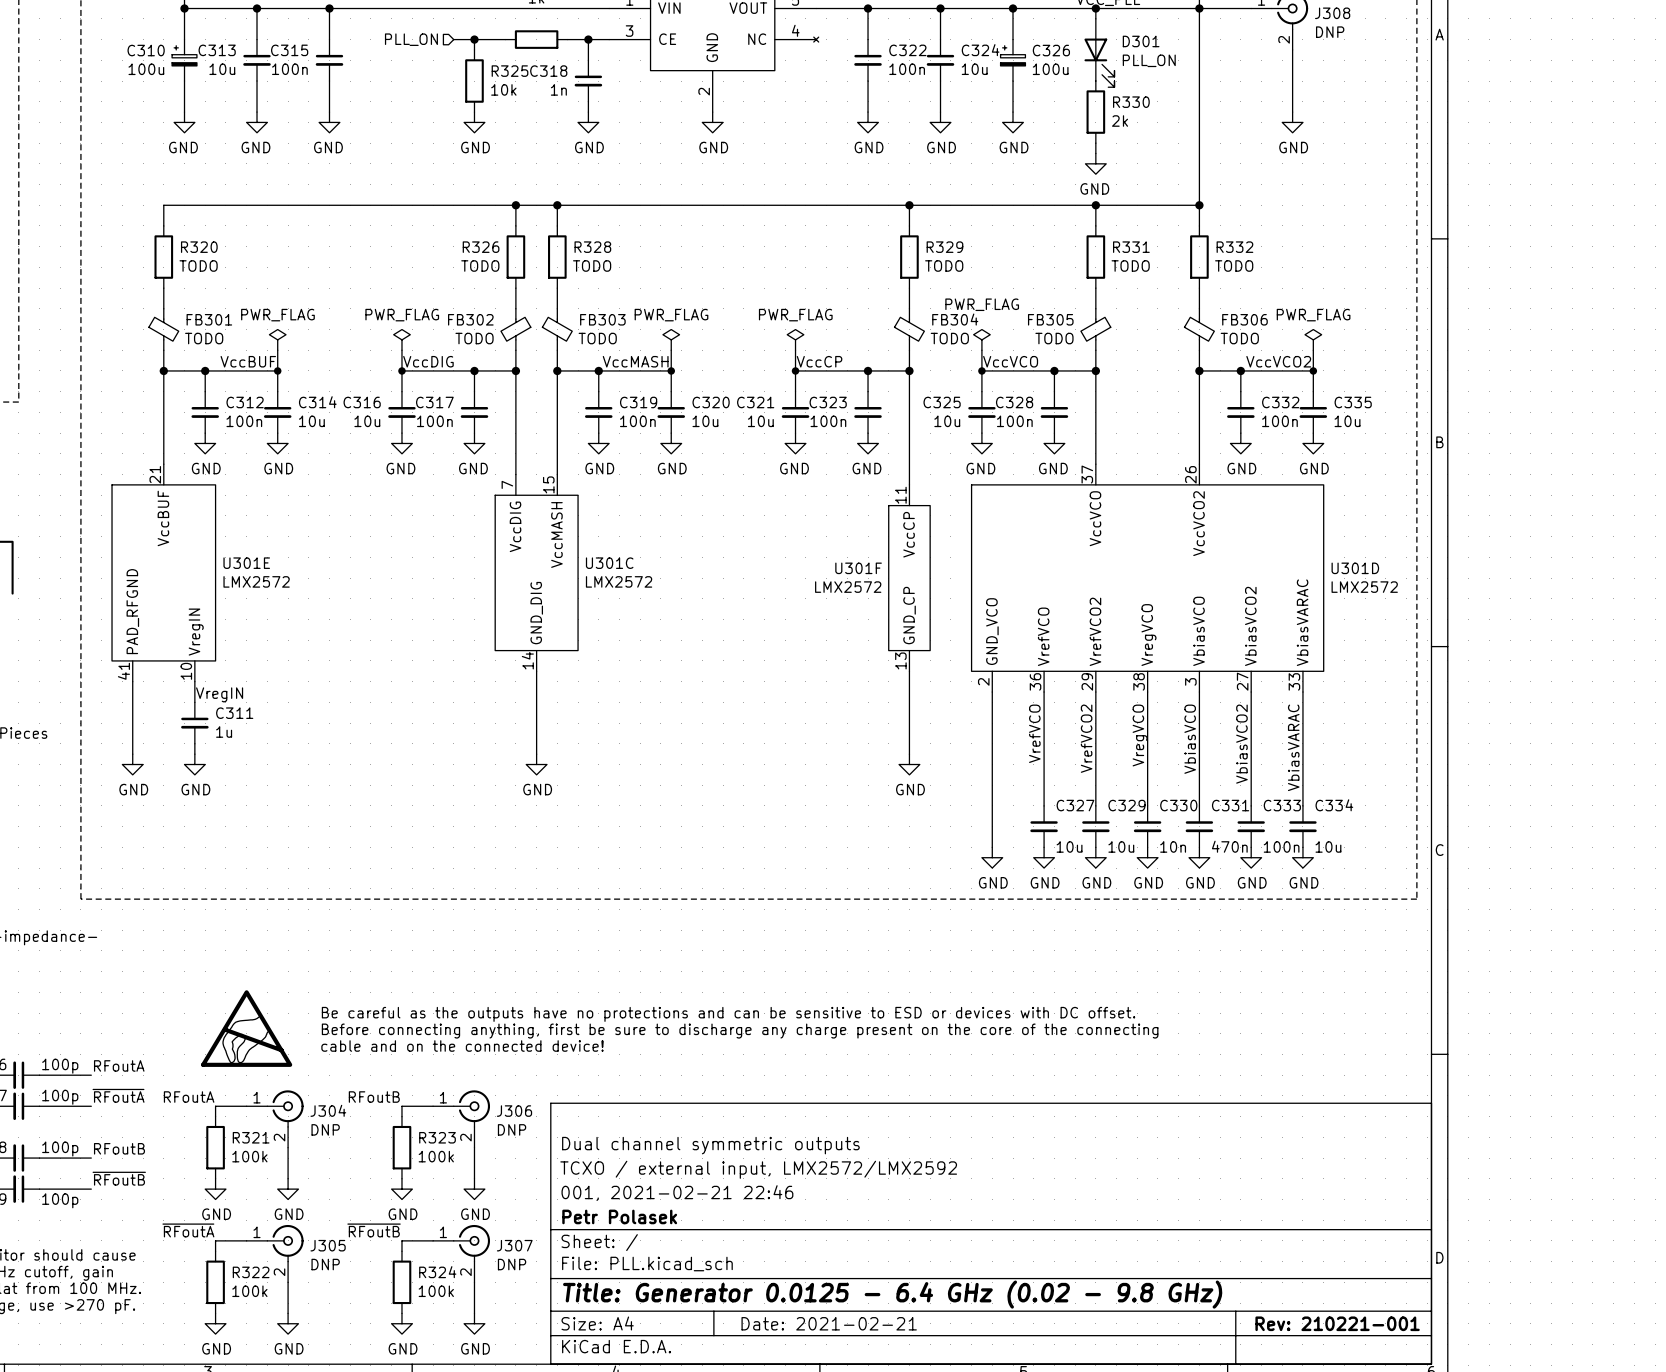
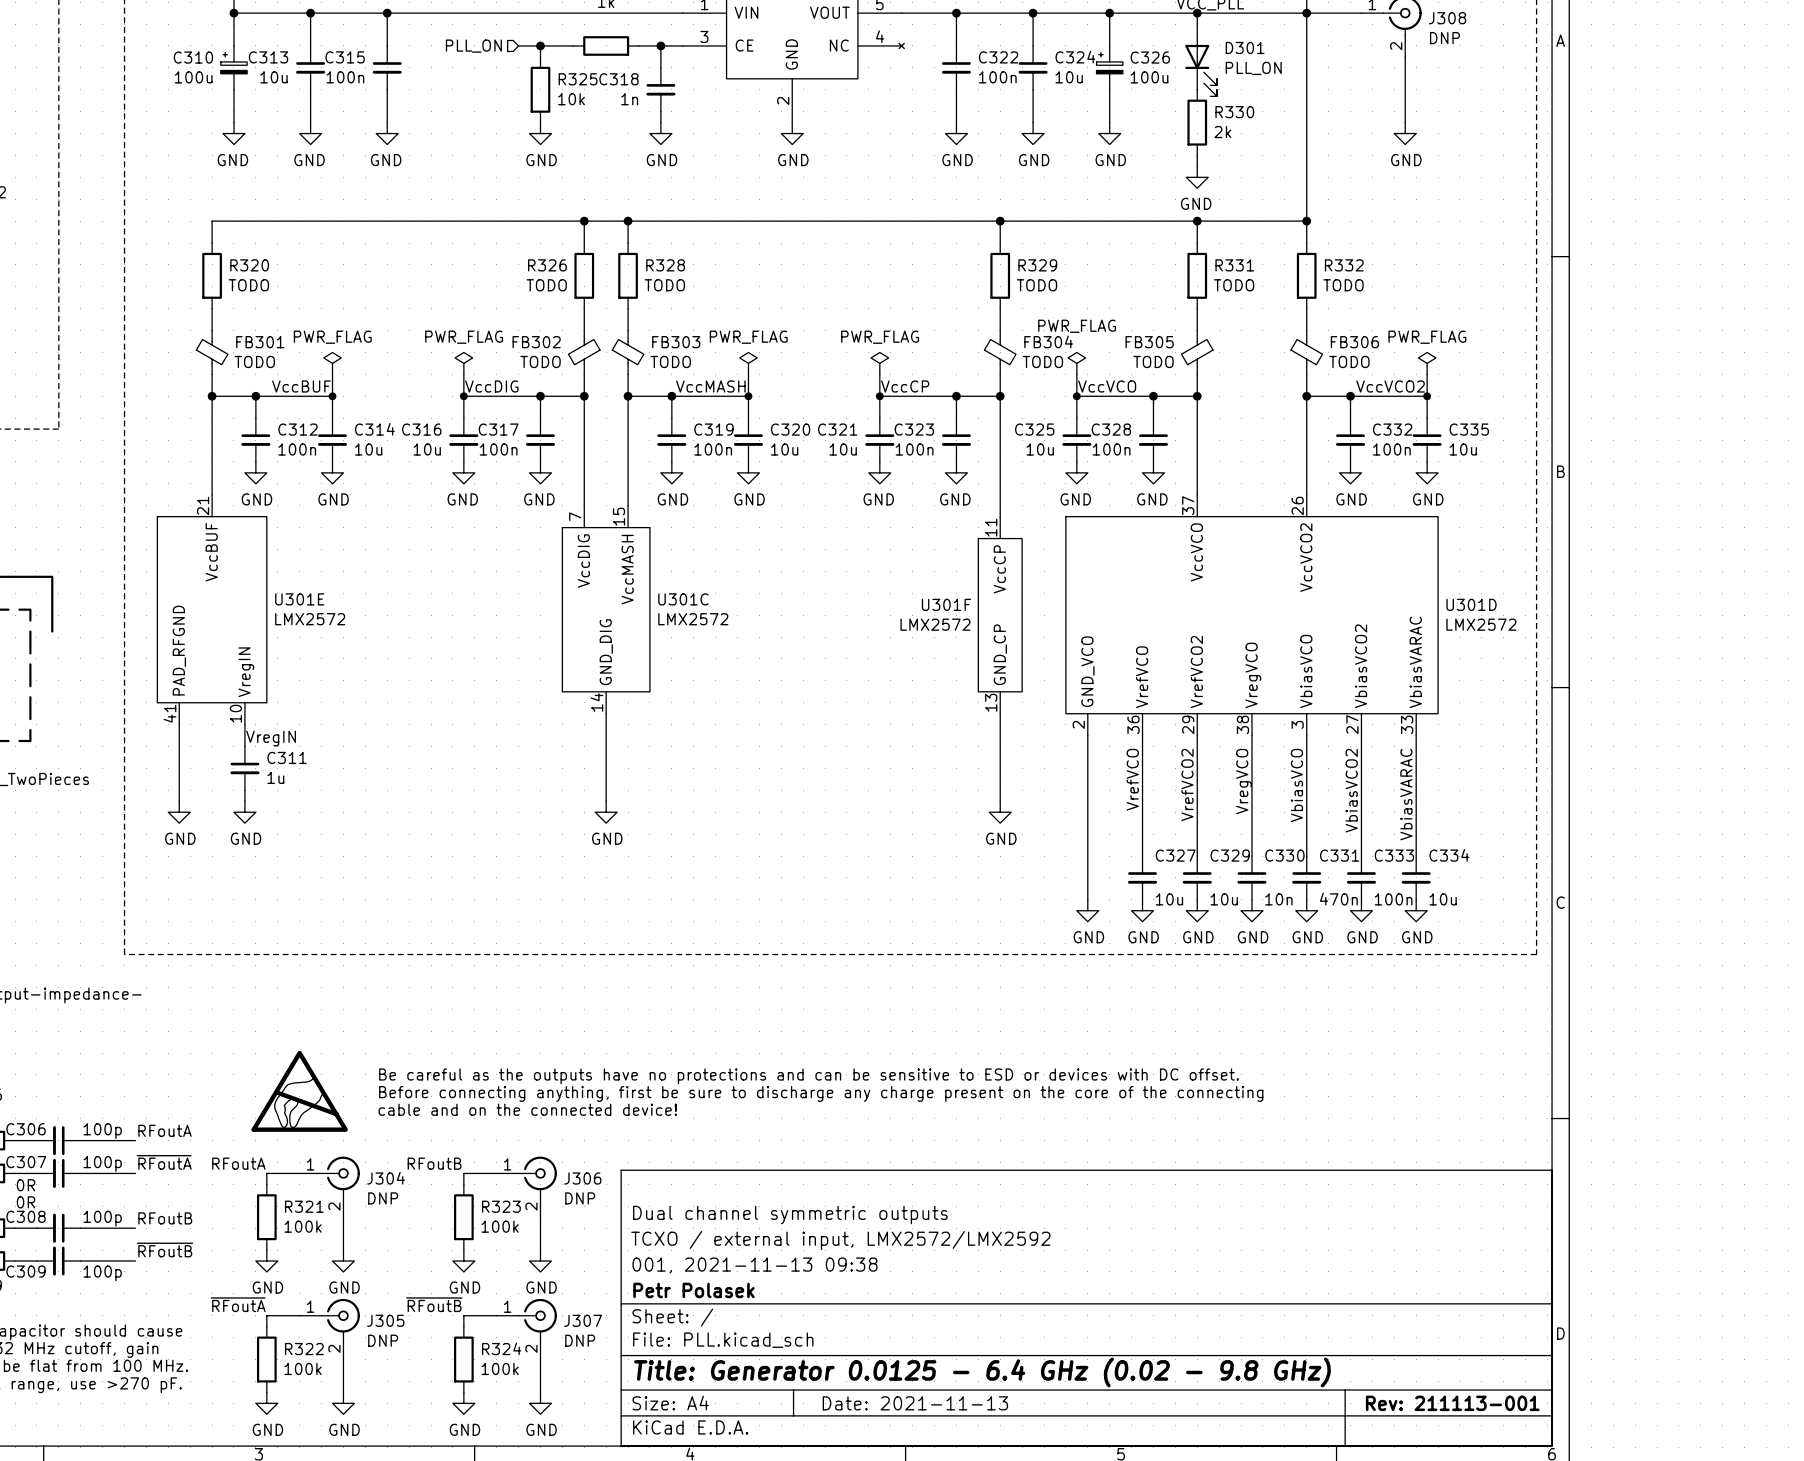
title block: 001, 2021-02-21 22:46 (677, 1193) -> 001, 2021-11-13 09:38 (755, 1265)
title block: Date: 2021-02-21 (829, 1323) -> Date: 2021-11-13 (915, 1403)
title block: Rev: 210221-001 (1337, 1323) -> Rev: 211113-001 (1452, 1403)

